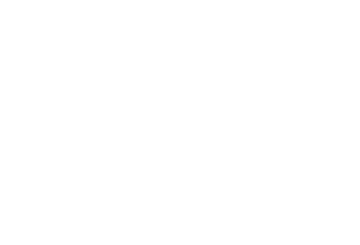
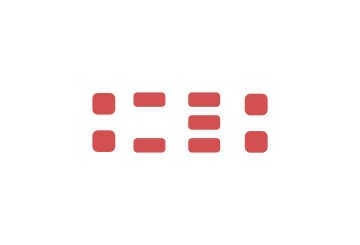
part: none -> (103, 122)
part: none -> (176, 122)
part: none -> (256, 123)

